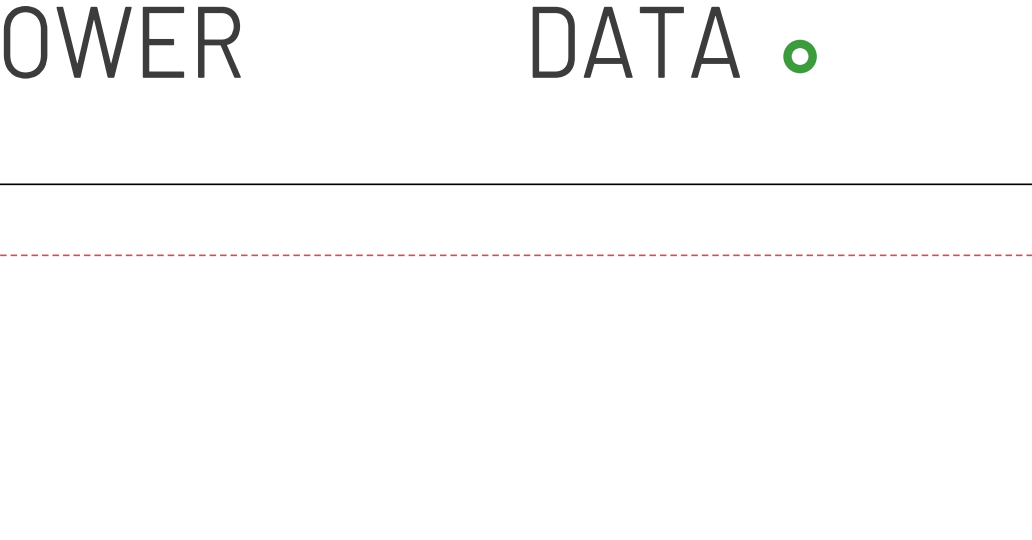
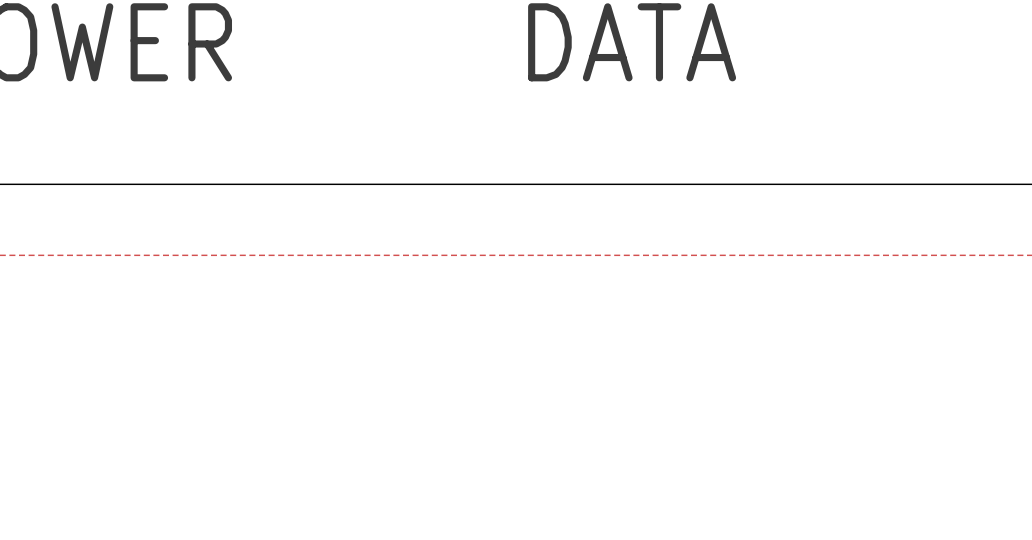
via: (800, 56) -> none

